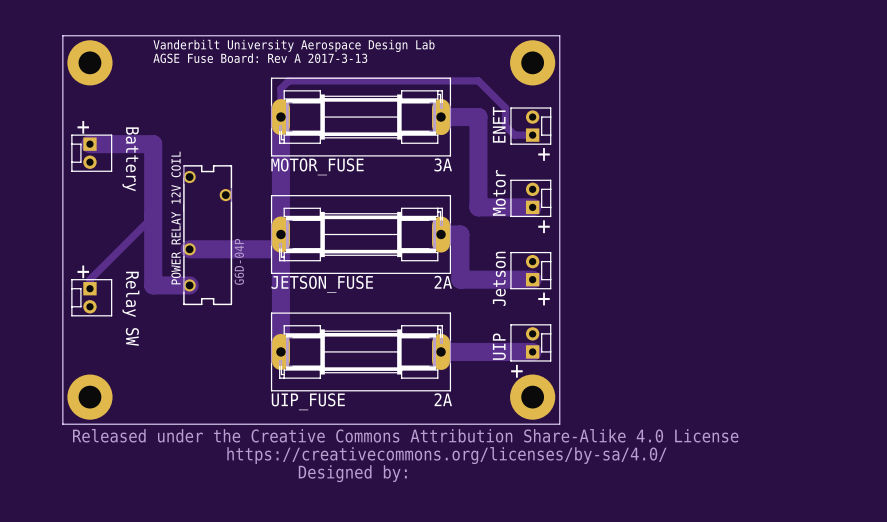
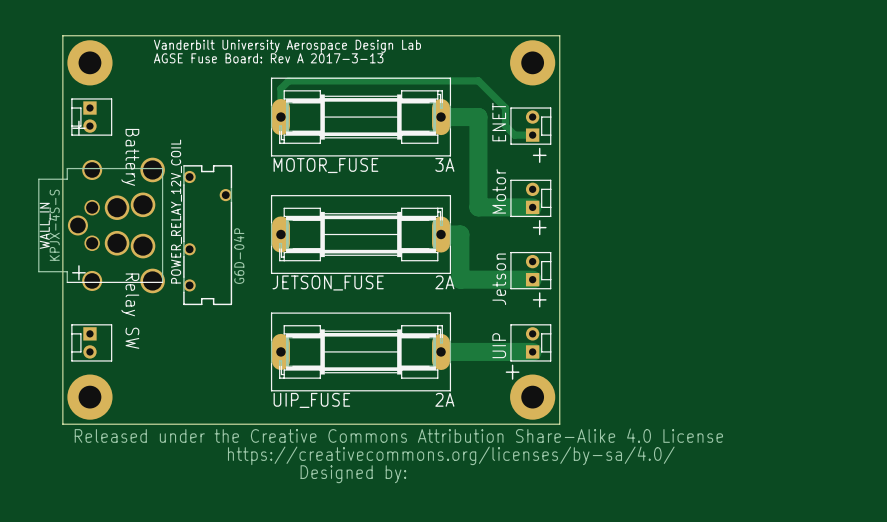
track: (280, 117) (280, 351) -> none
track: (89, 144) (153, 144) (153, 285) (189, 285) -> none
part position: (91, 153) -> (91, 117)
track: (153, 216) (89, 279) (89, 288) -> none
WALL_IN: none -> KPJX-4S-S (101, 225)
track: (189, 249) (280, 249) -> none
part position: (91, 297) -> (91, 342)

